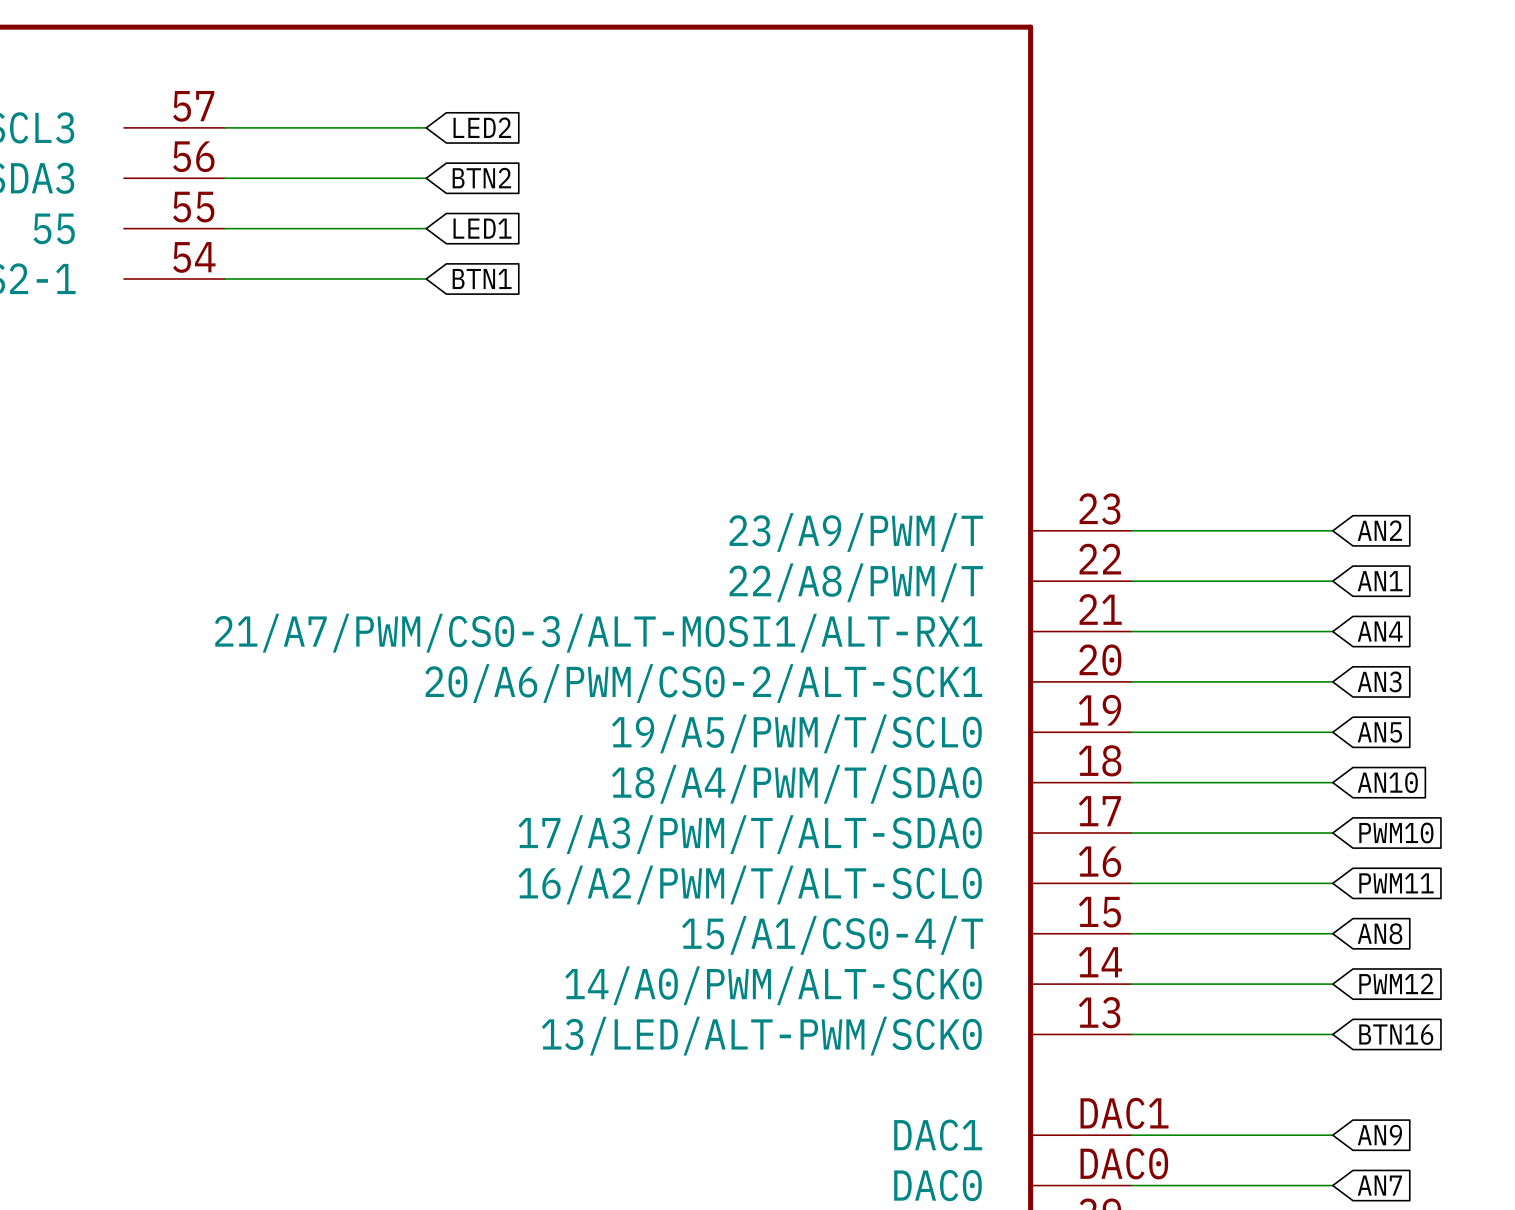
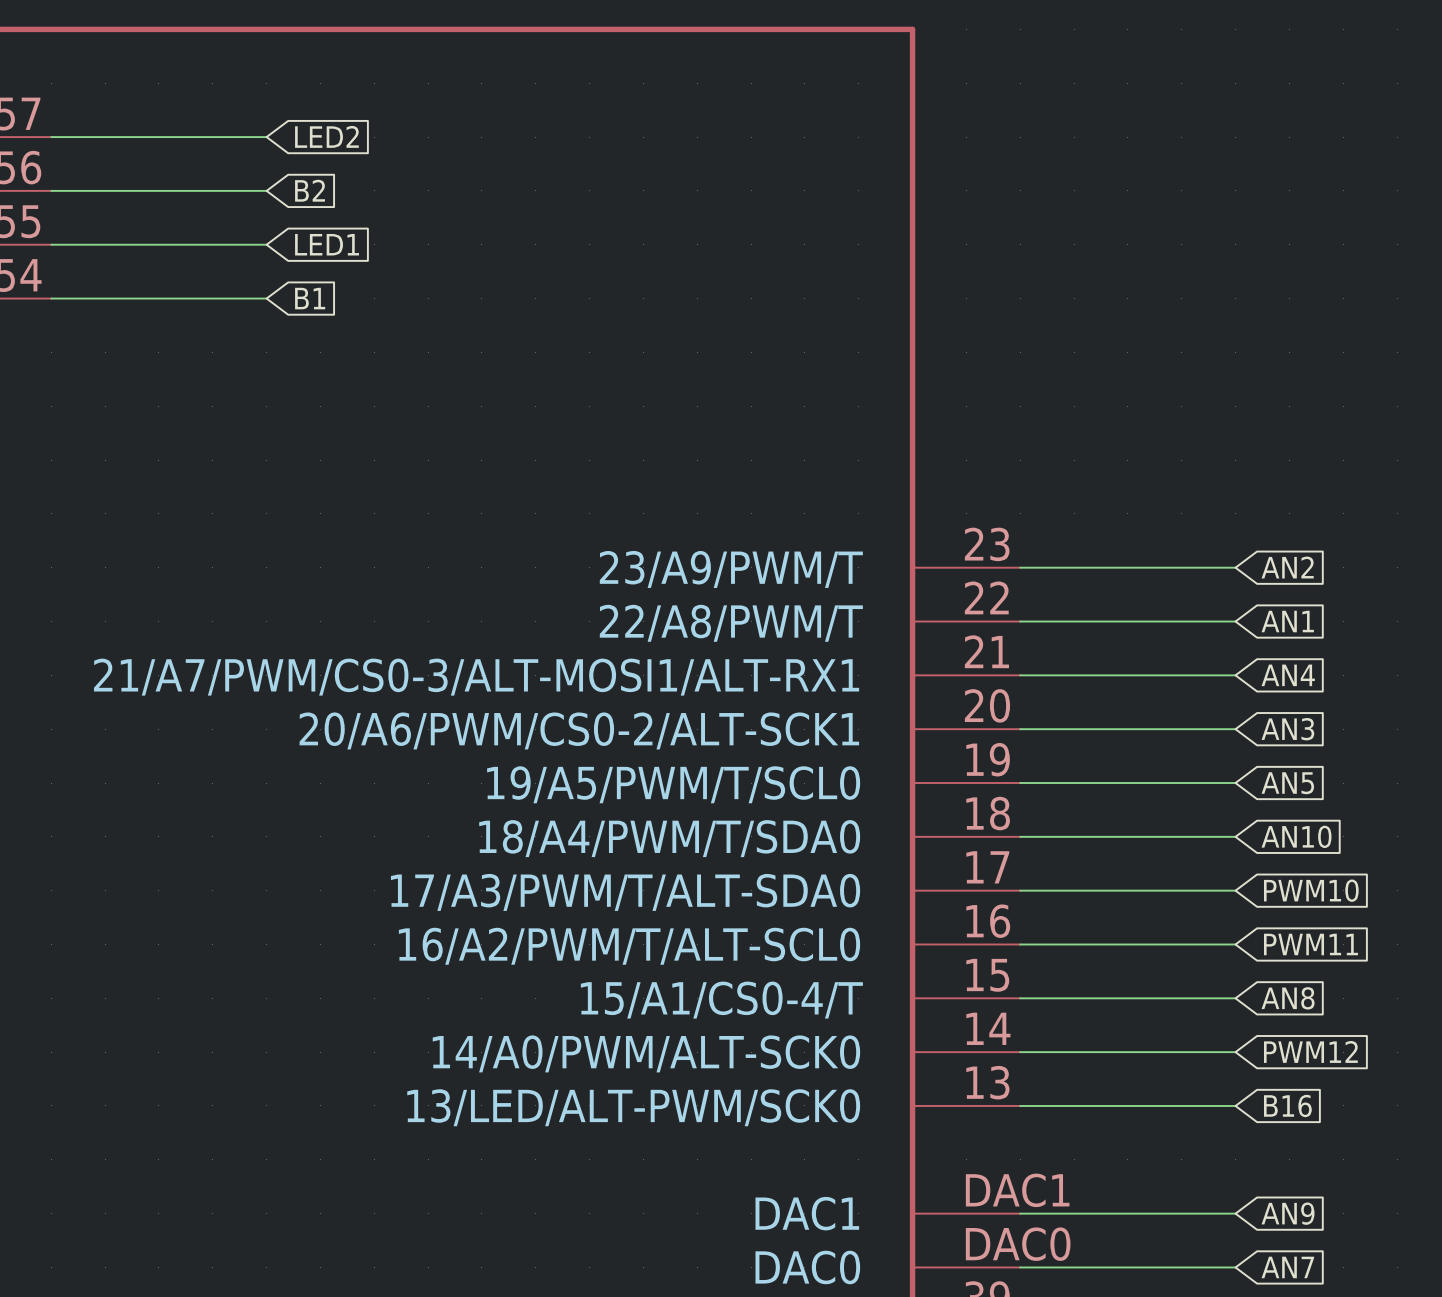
global label: BTN2 (481, 178) -> B2 (310, 190)
global label: BTN1 (482, 278) -> B1 (310, 298)
global label: BTN16 (1396, 1034) -> B16 (1287, 1105)

